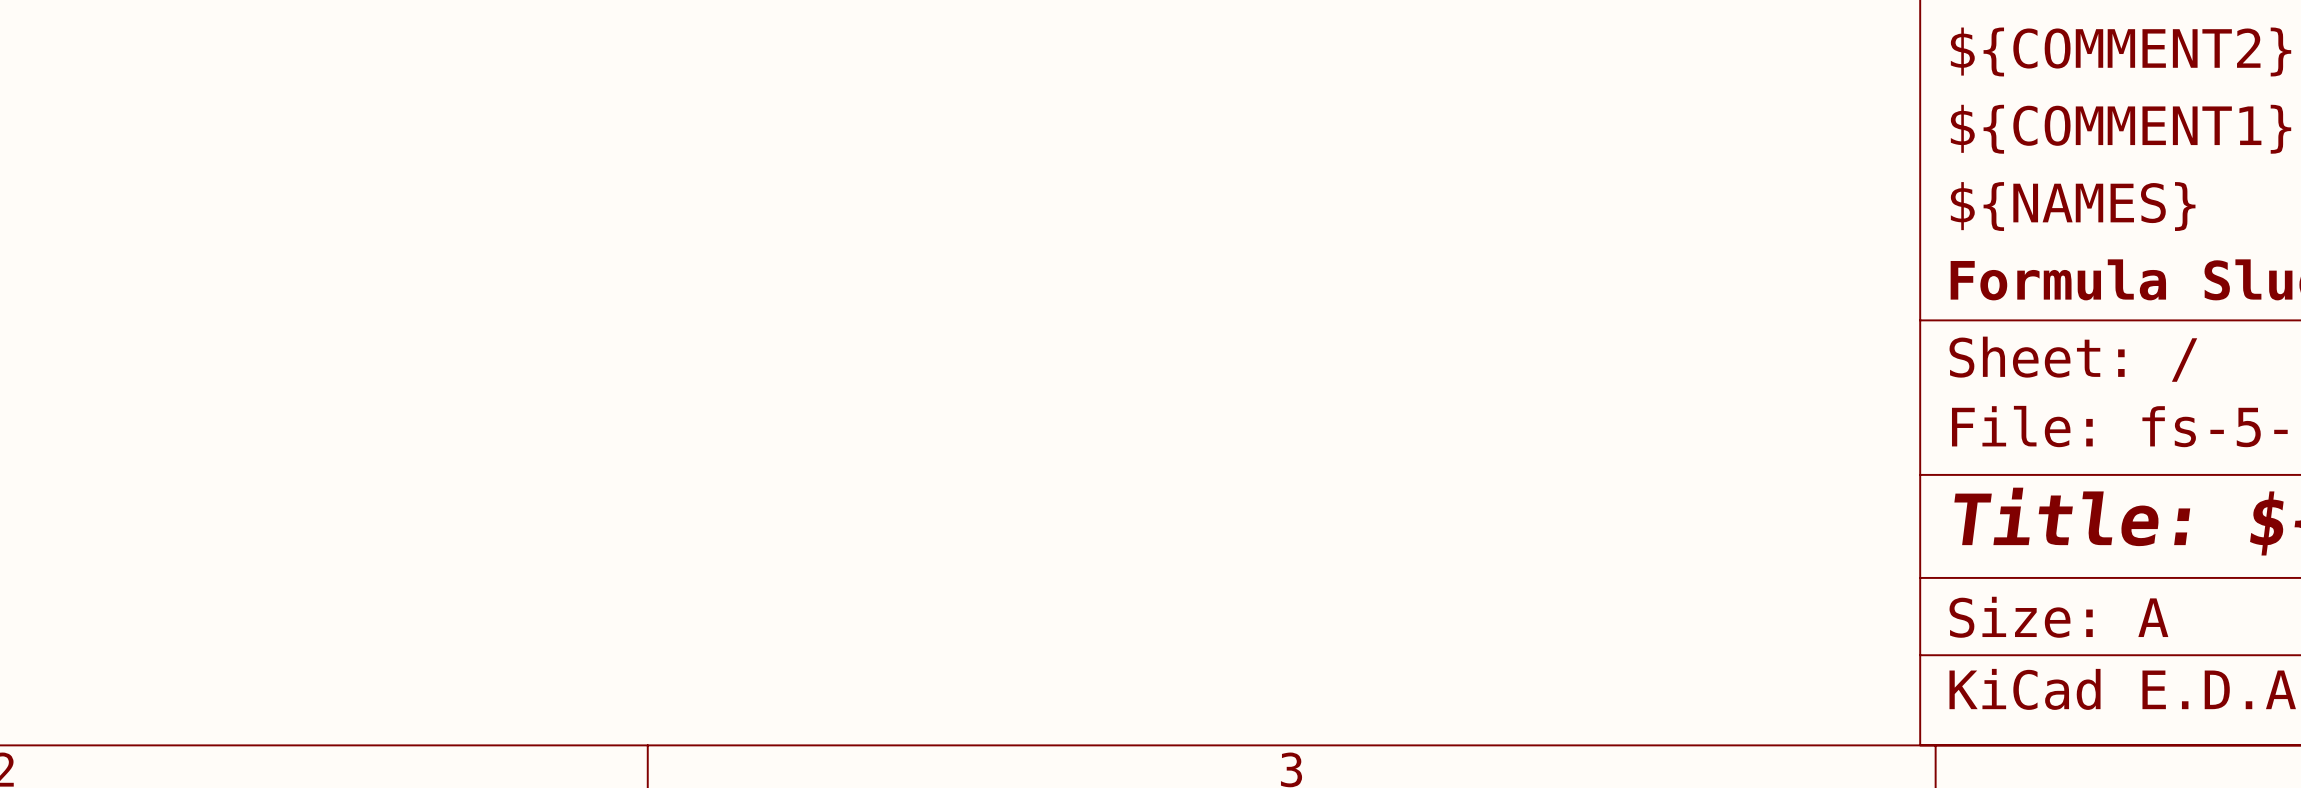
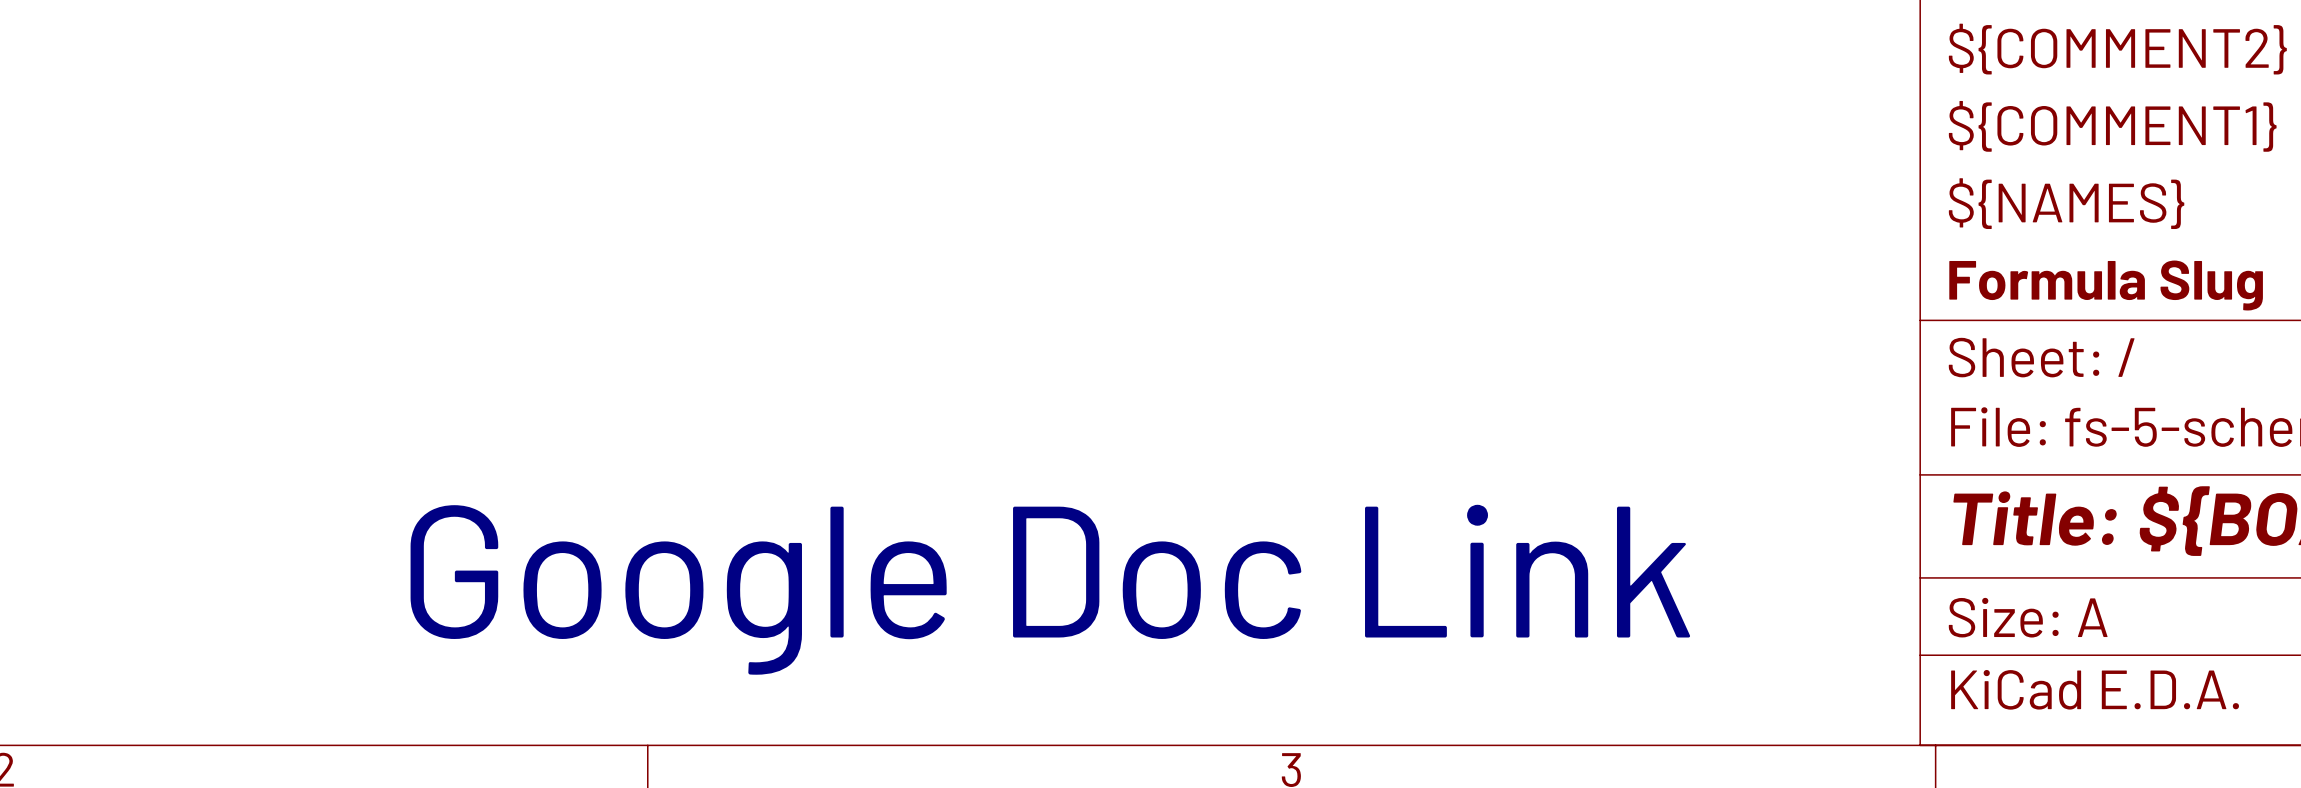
text: none -> Google Doc Link (1050, 589)

